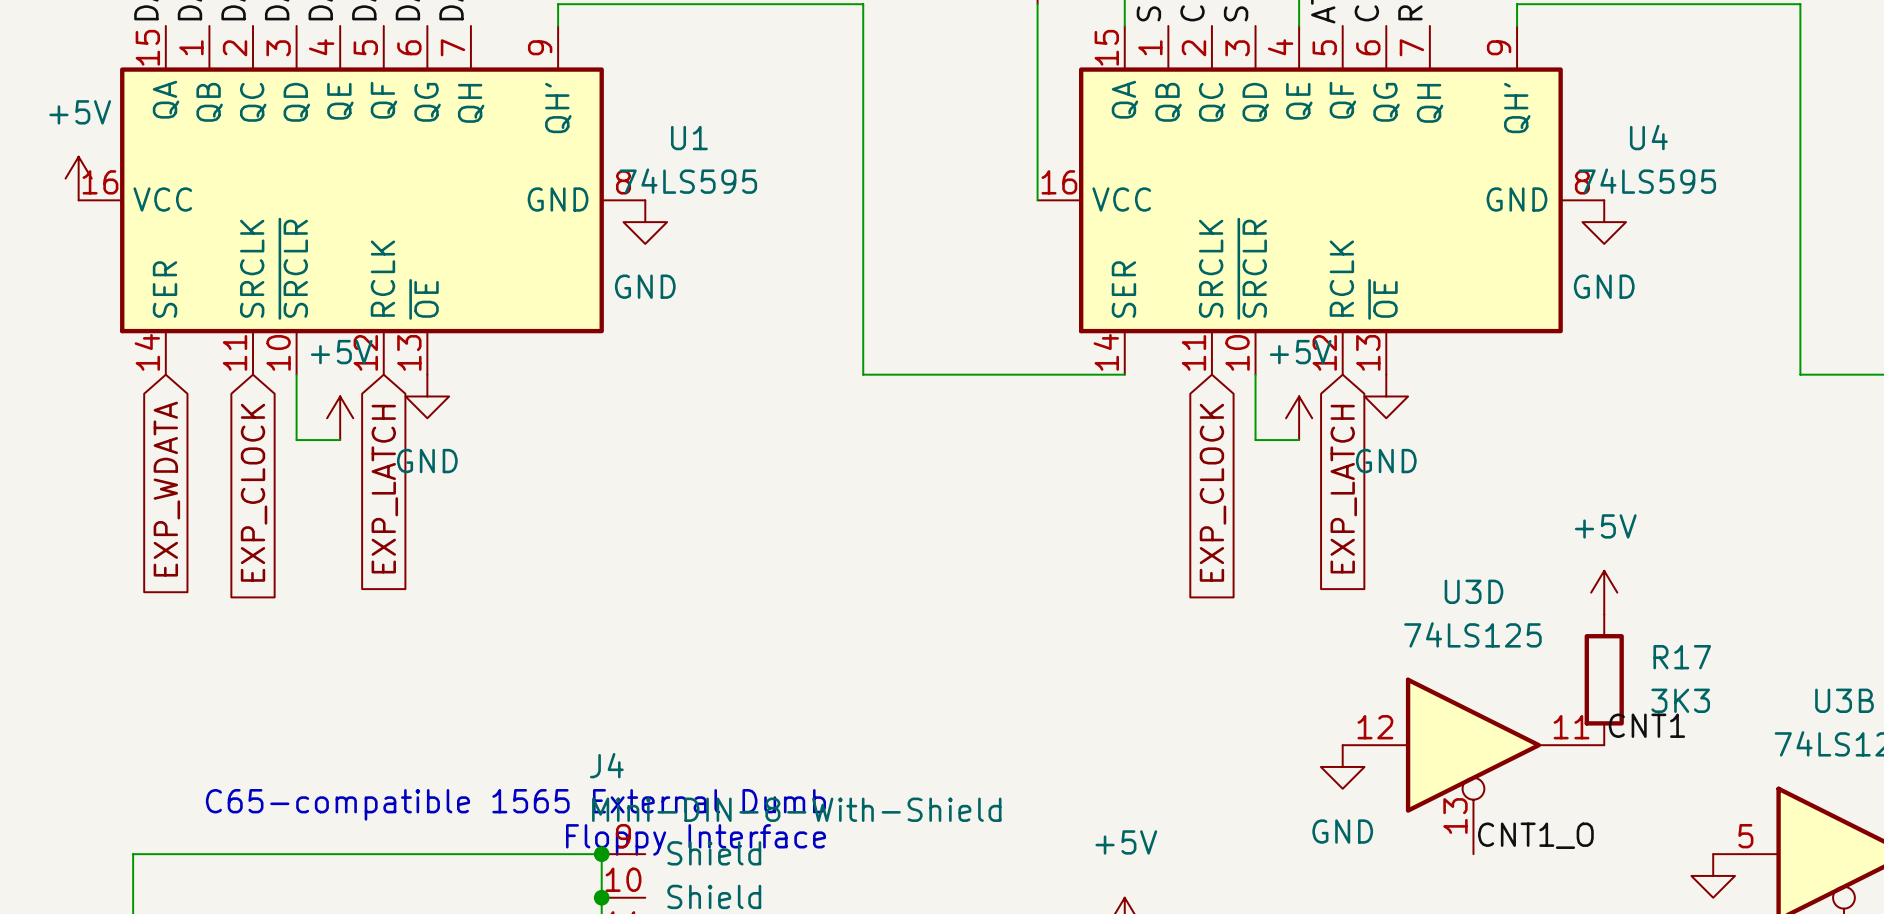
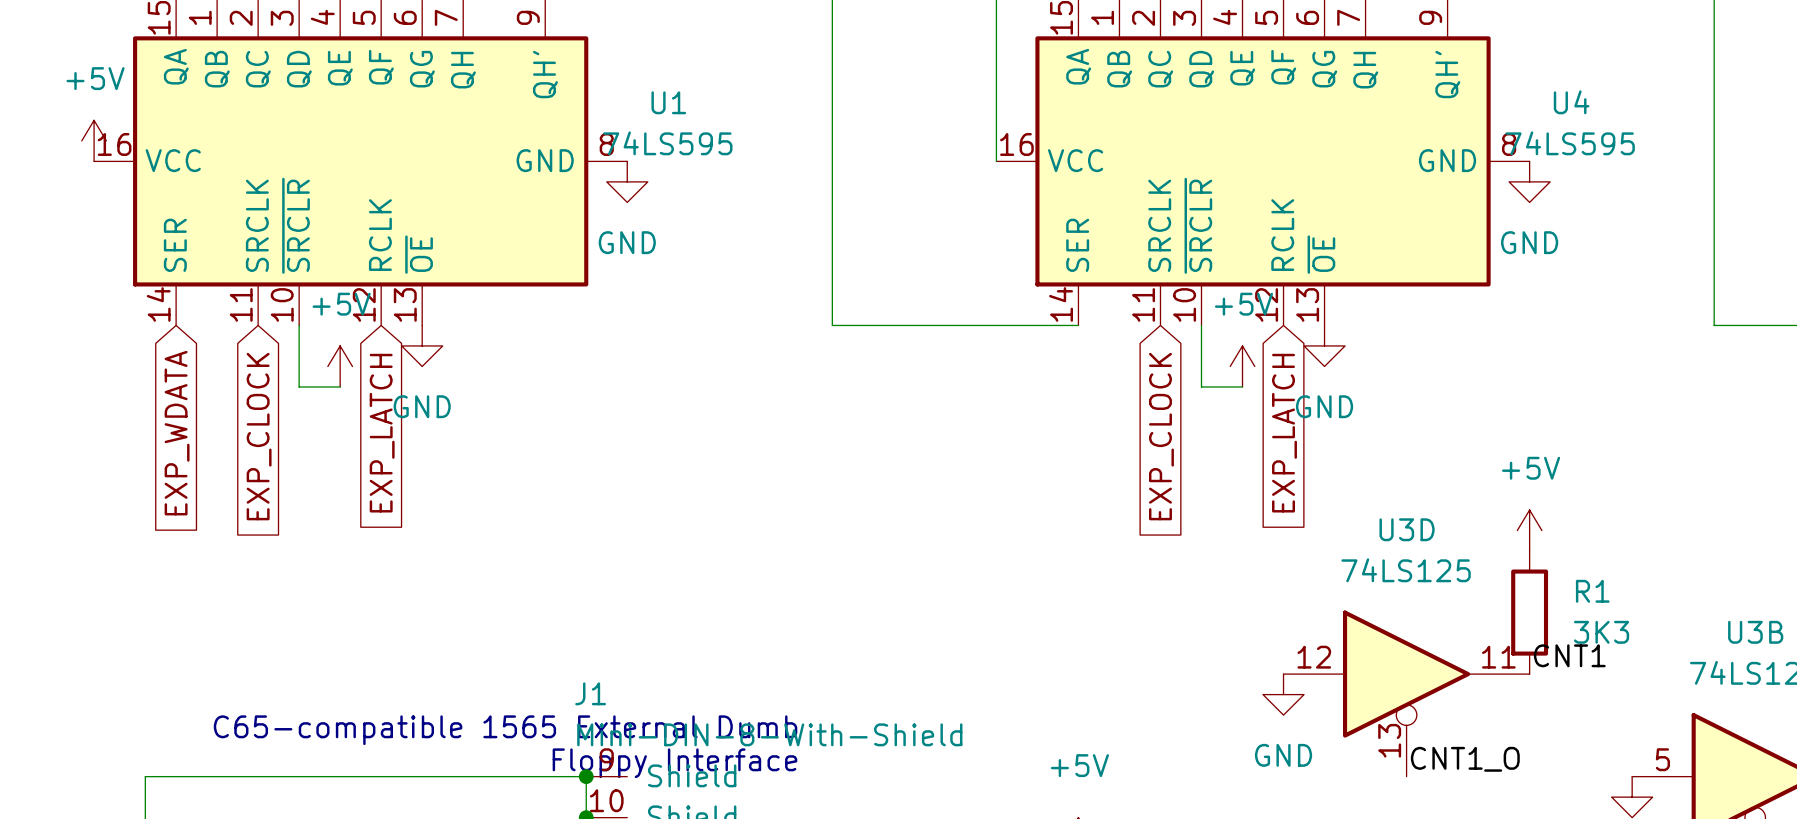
R17 name: R17 (1682, 657) -> R1 (1592, 591)
J4 name: J4 (606, 765) -> J1 (590, 693)

